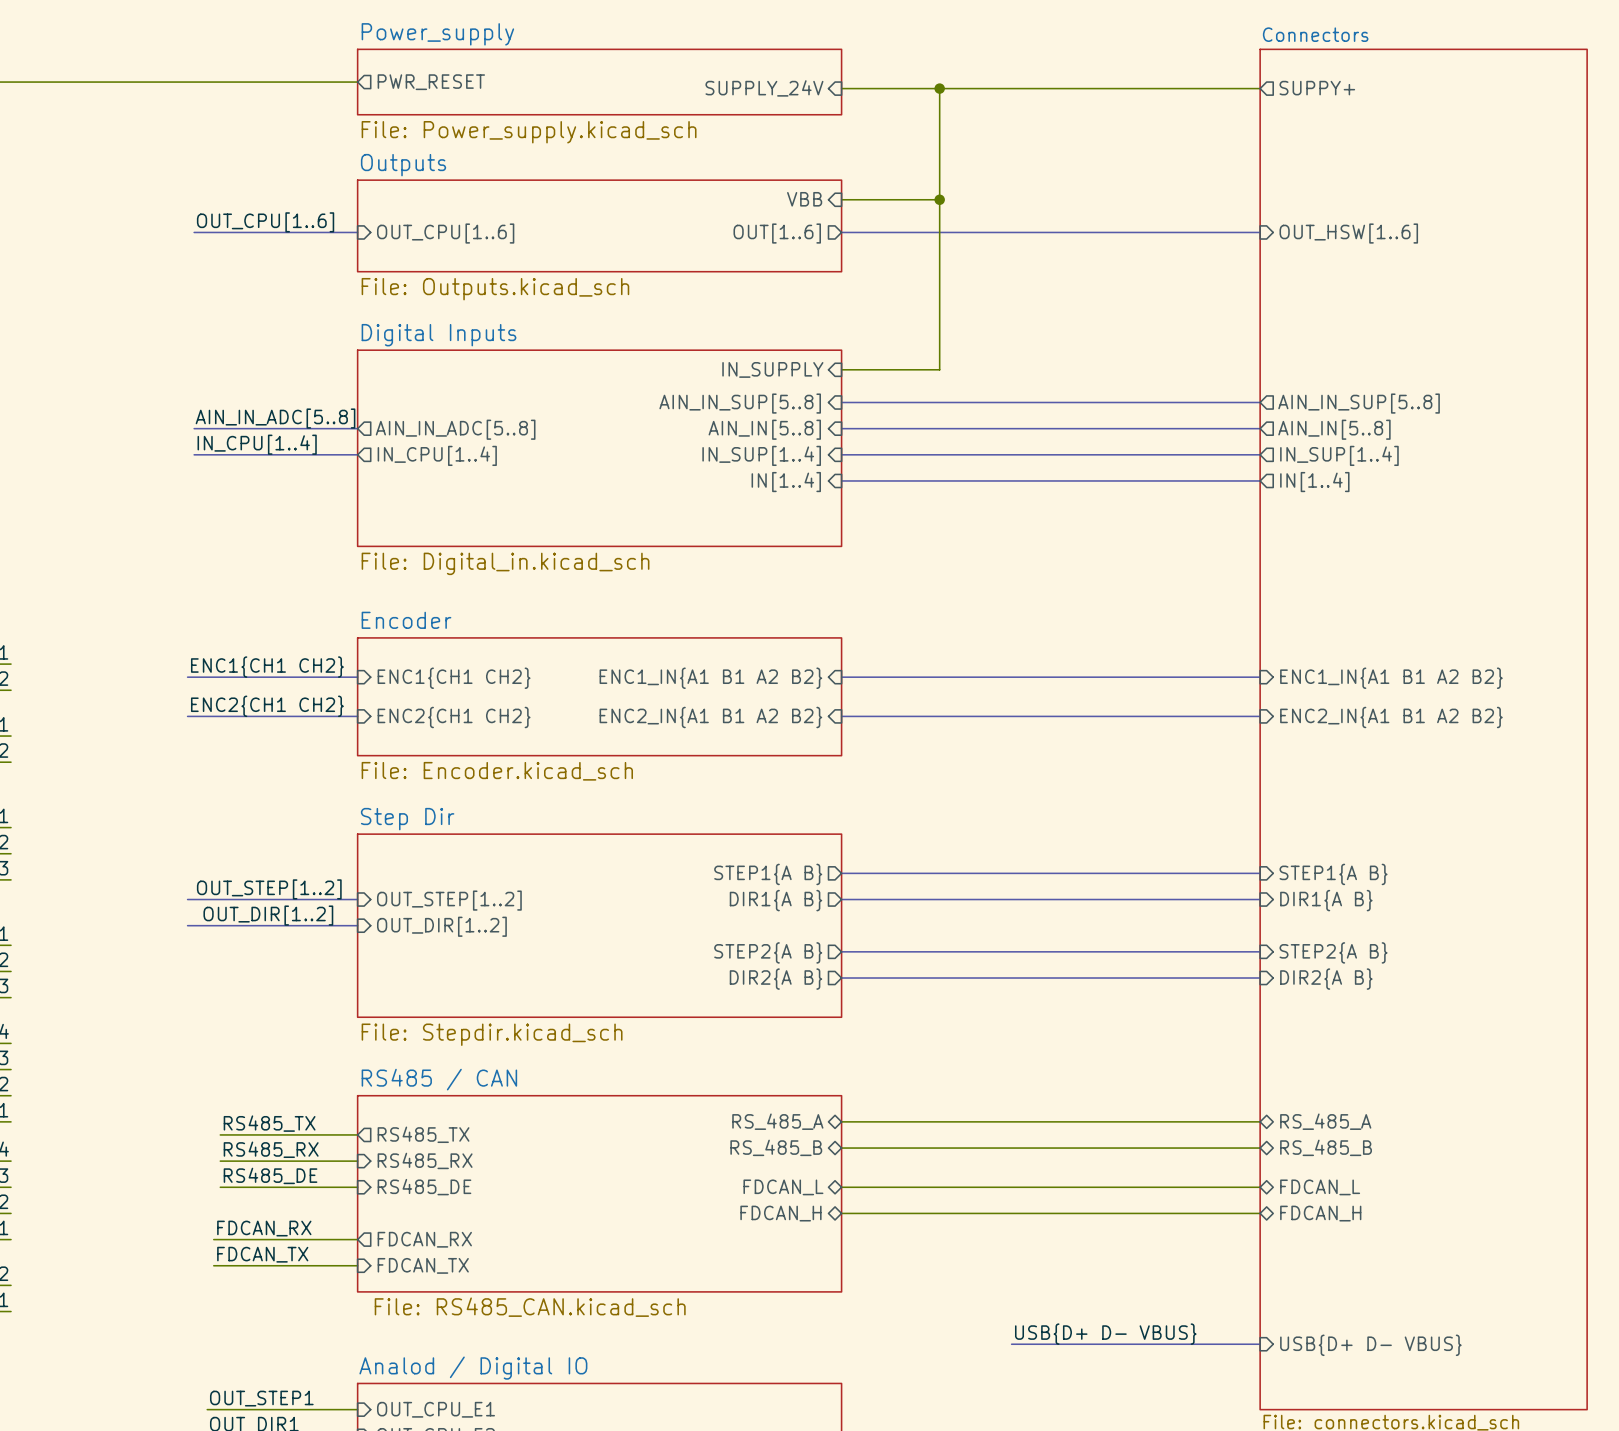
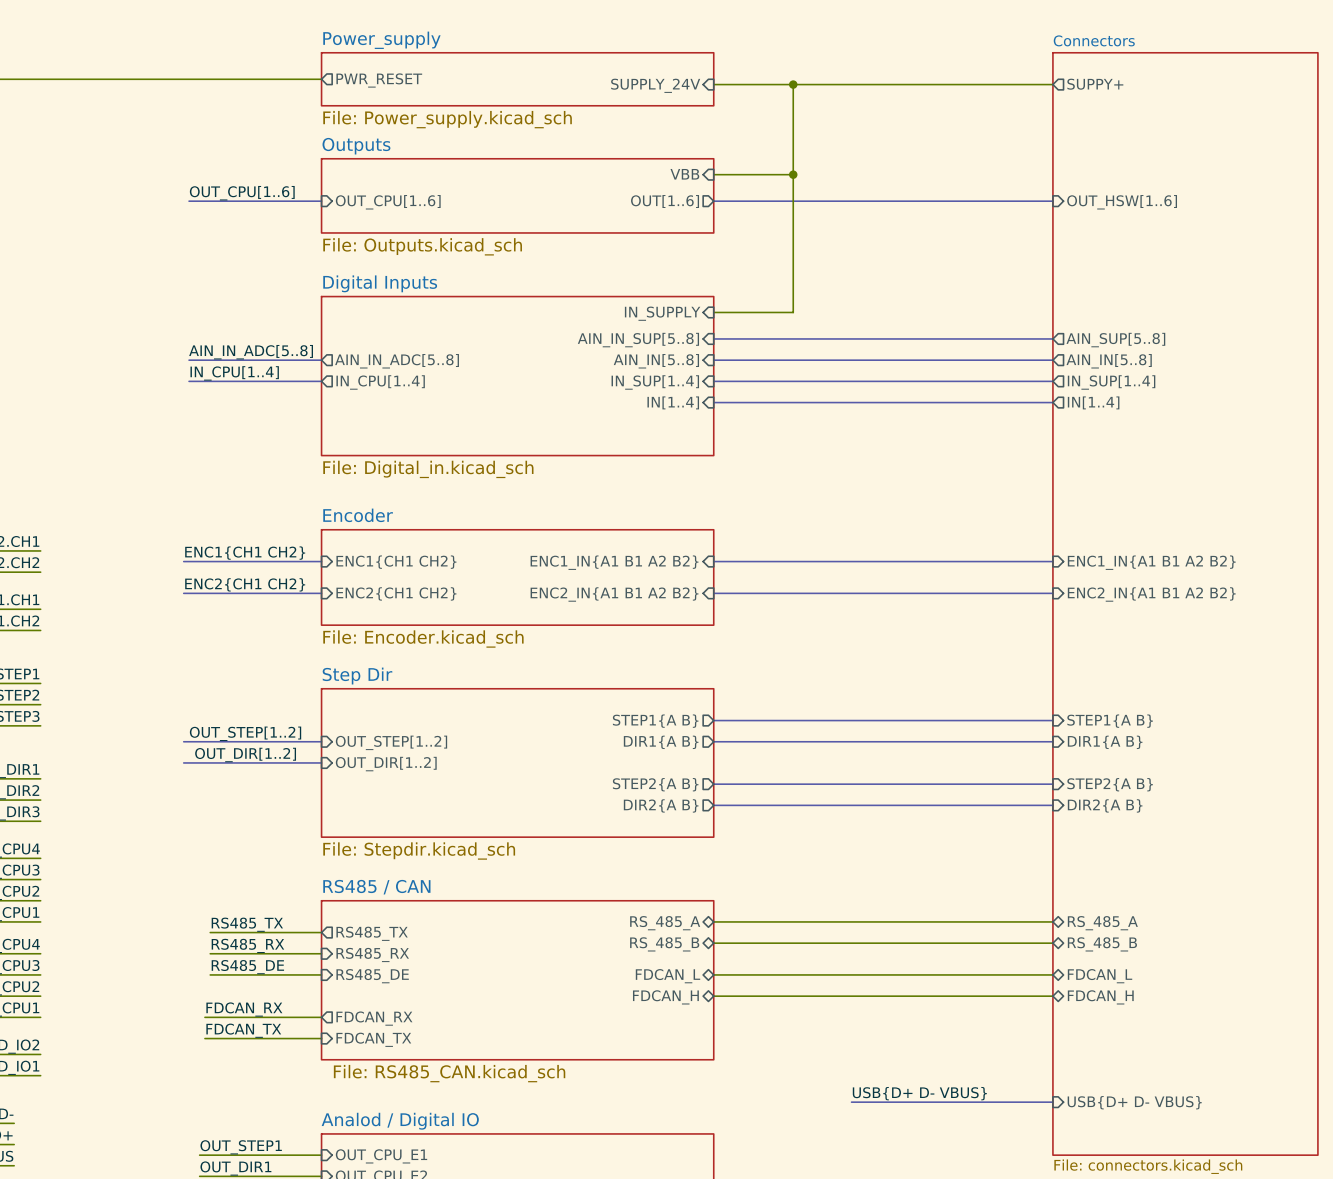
sheet pin: AIN_IN_SUP[5..8] (1359, 403) -> AIN_SUP[5..8] (1115, 340)

